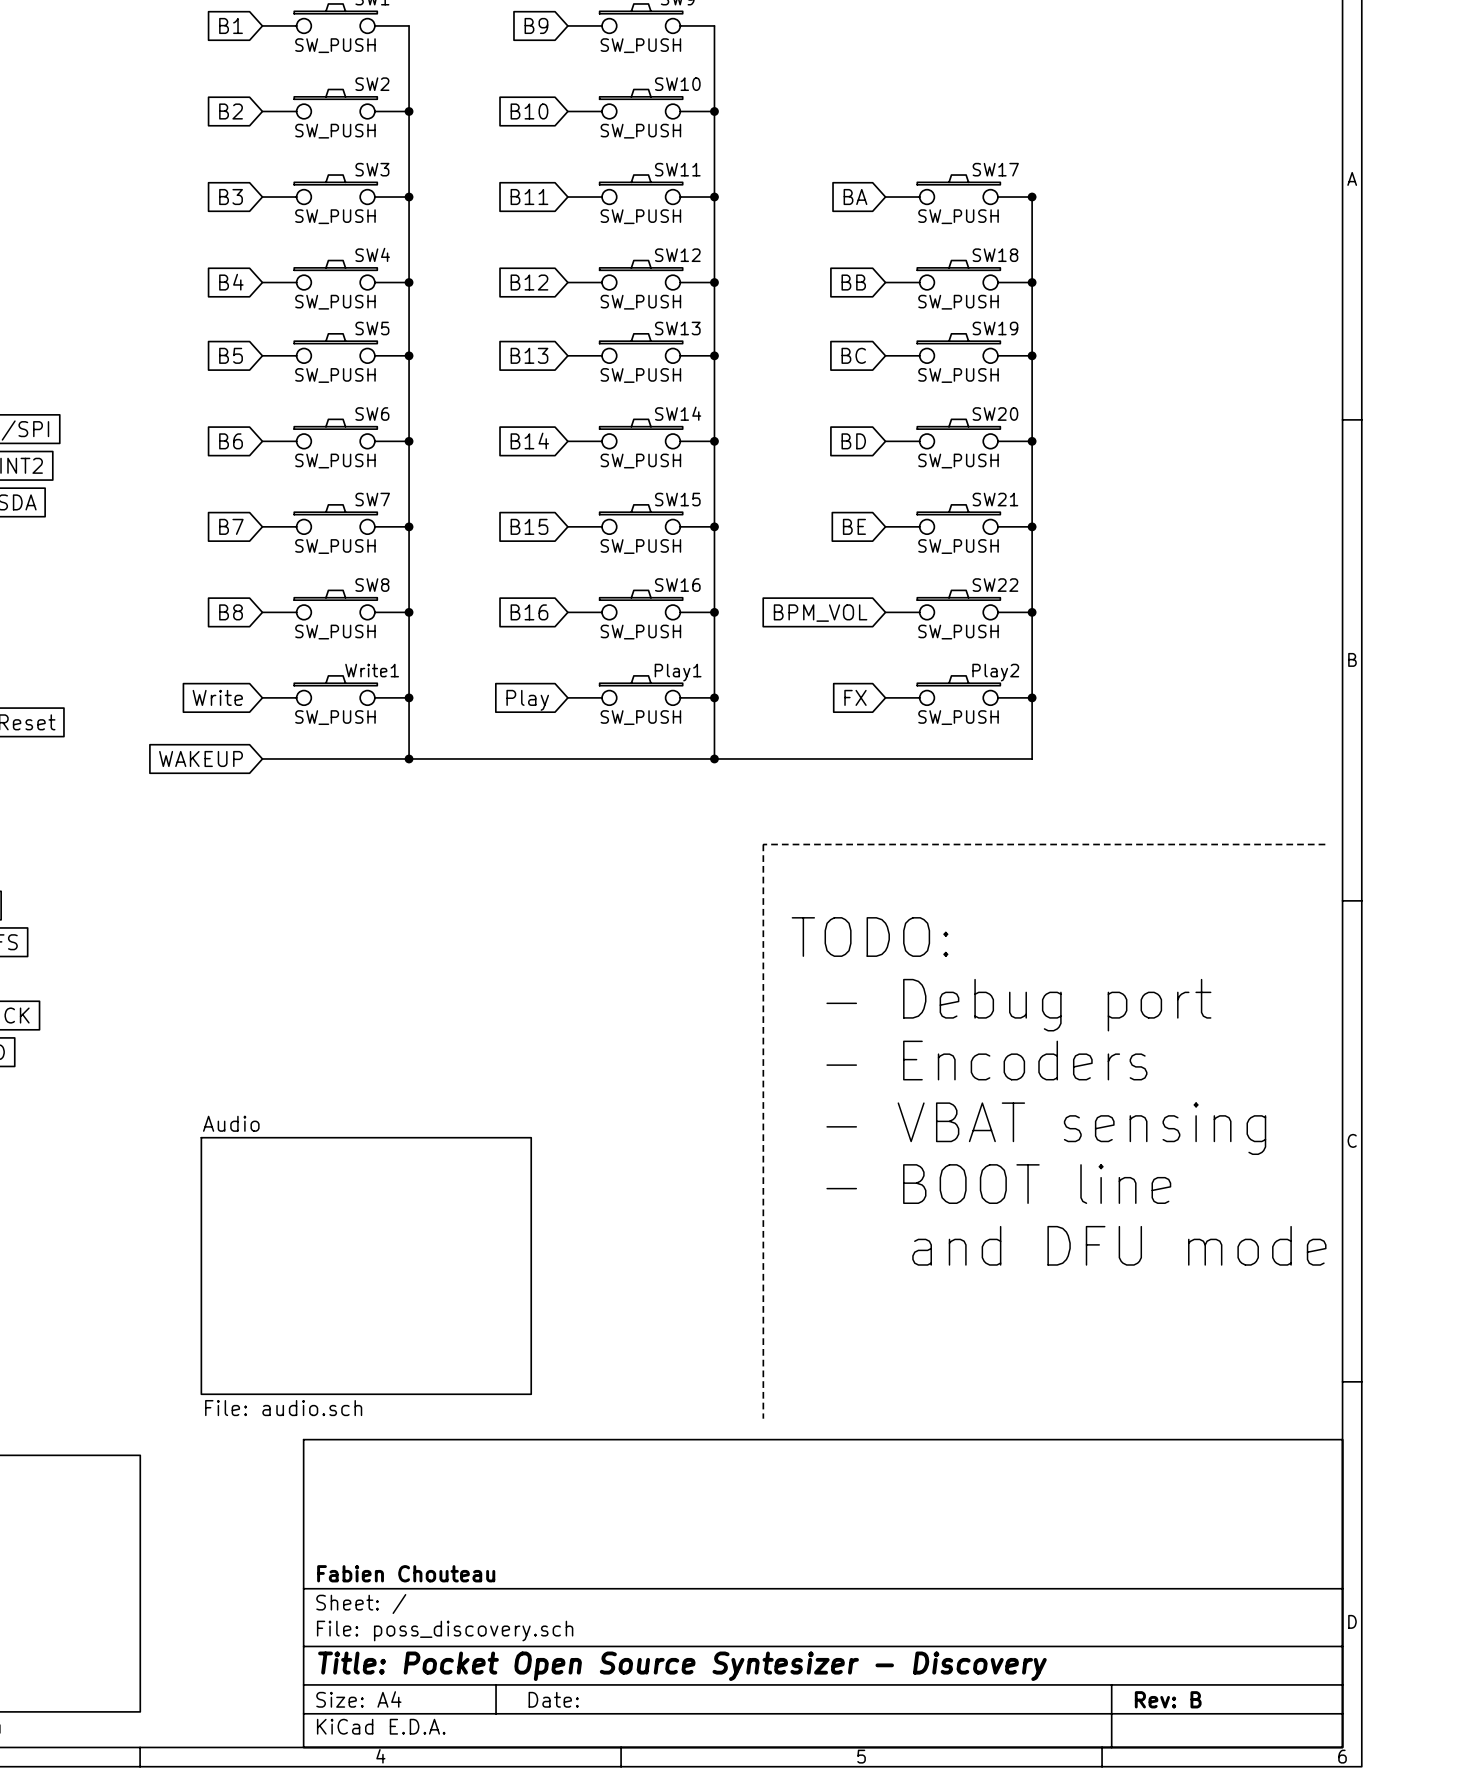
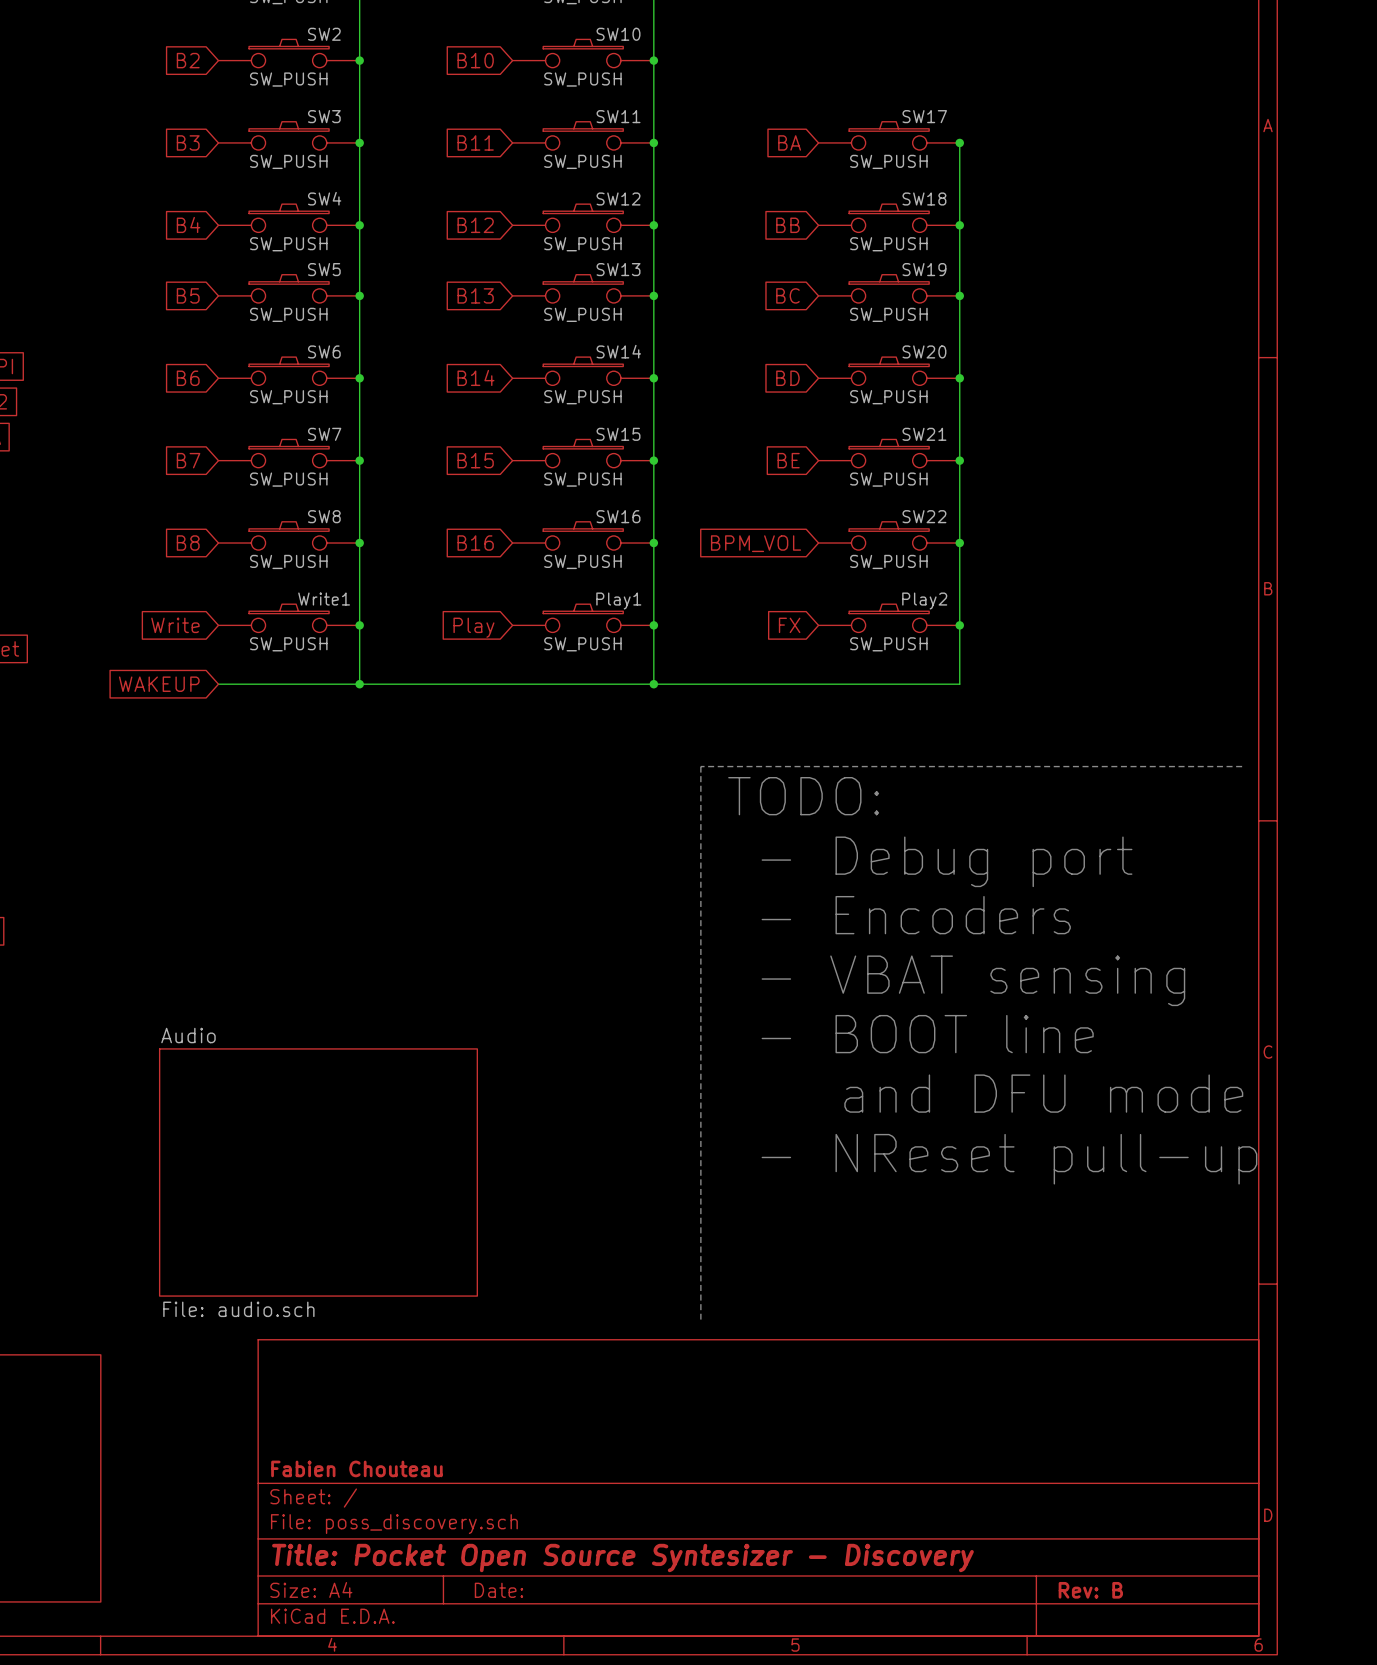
text: none -> TODO: (803, 796)
text: TODO: (870, 937) -> - Debug port (947, 861)
text: - Debug port (1018, 1005) -> - Encoders (916, 915)
text: - Encoders (986, 1060) -> - VBAT sensing (973, 980)
text: - VBAT sensing (1046, 1128) -> - BOOT line (927, 1034)
text: - BOOT line (998, 1184) -> and DFU mode (1043, 1093)
text: and DFU mode (1119, 1245) -> - NReset pull-up (1009, 1159)

